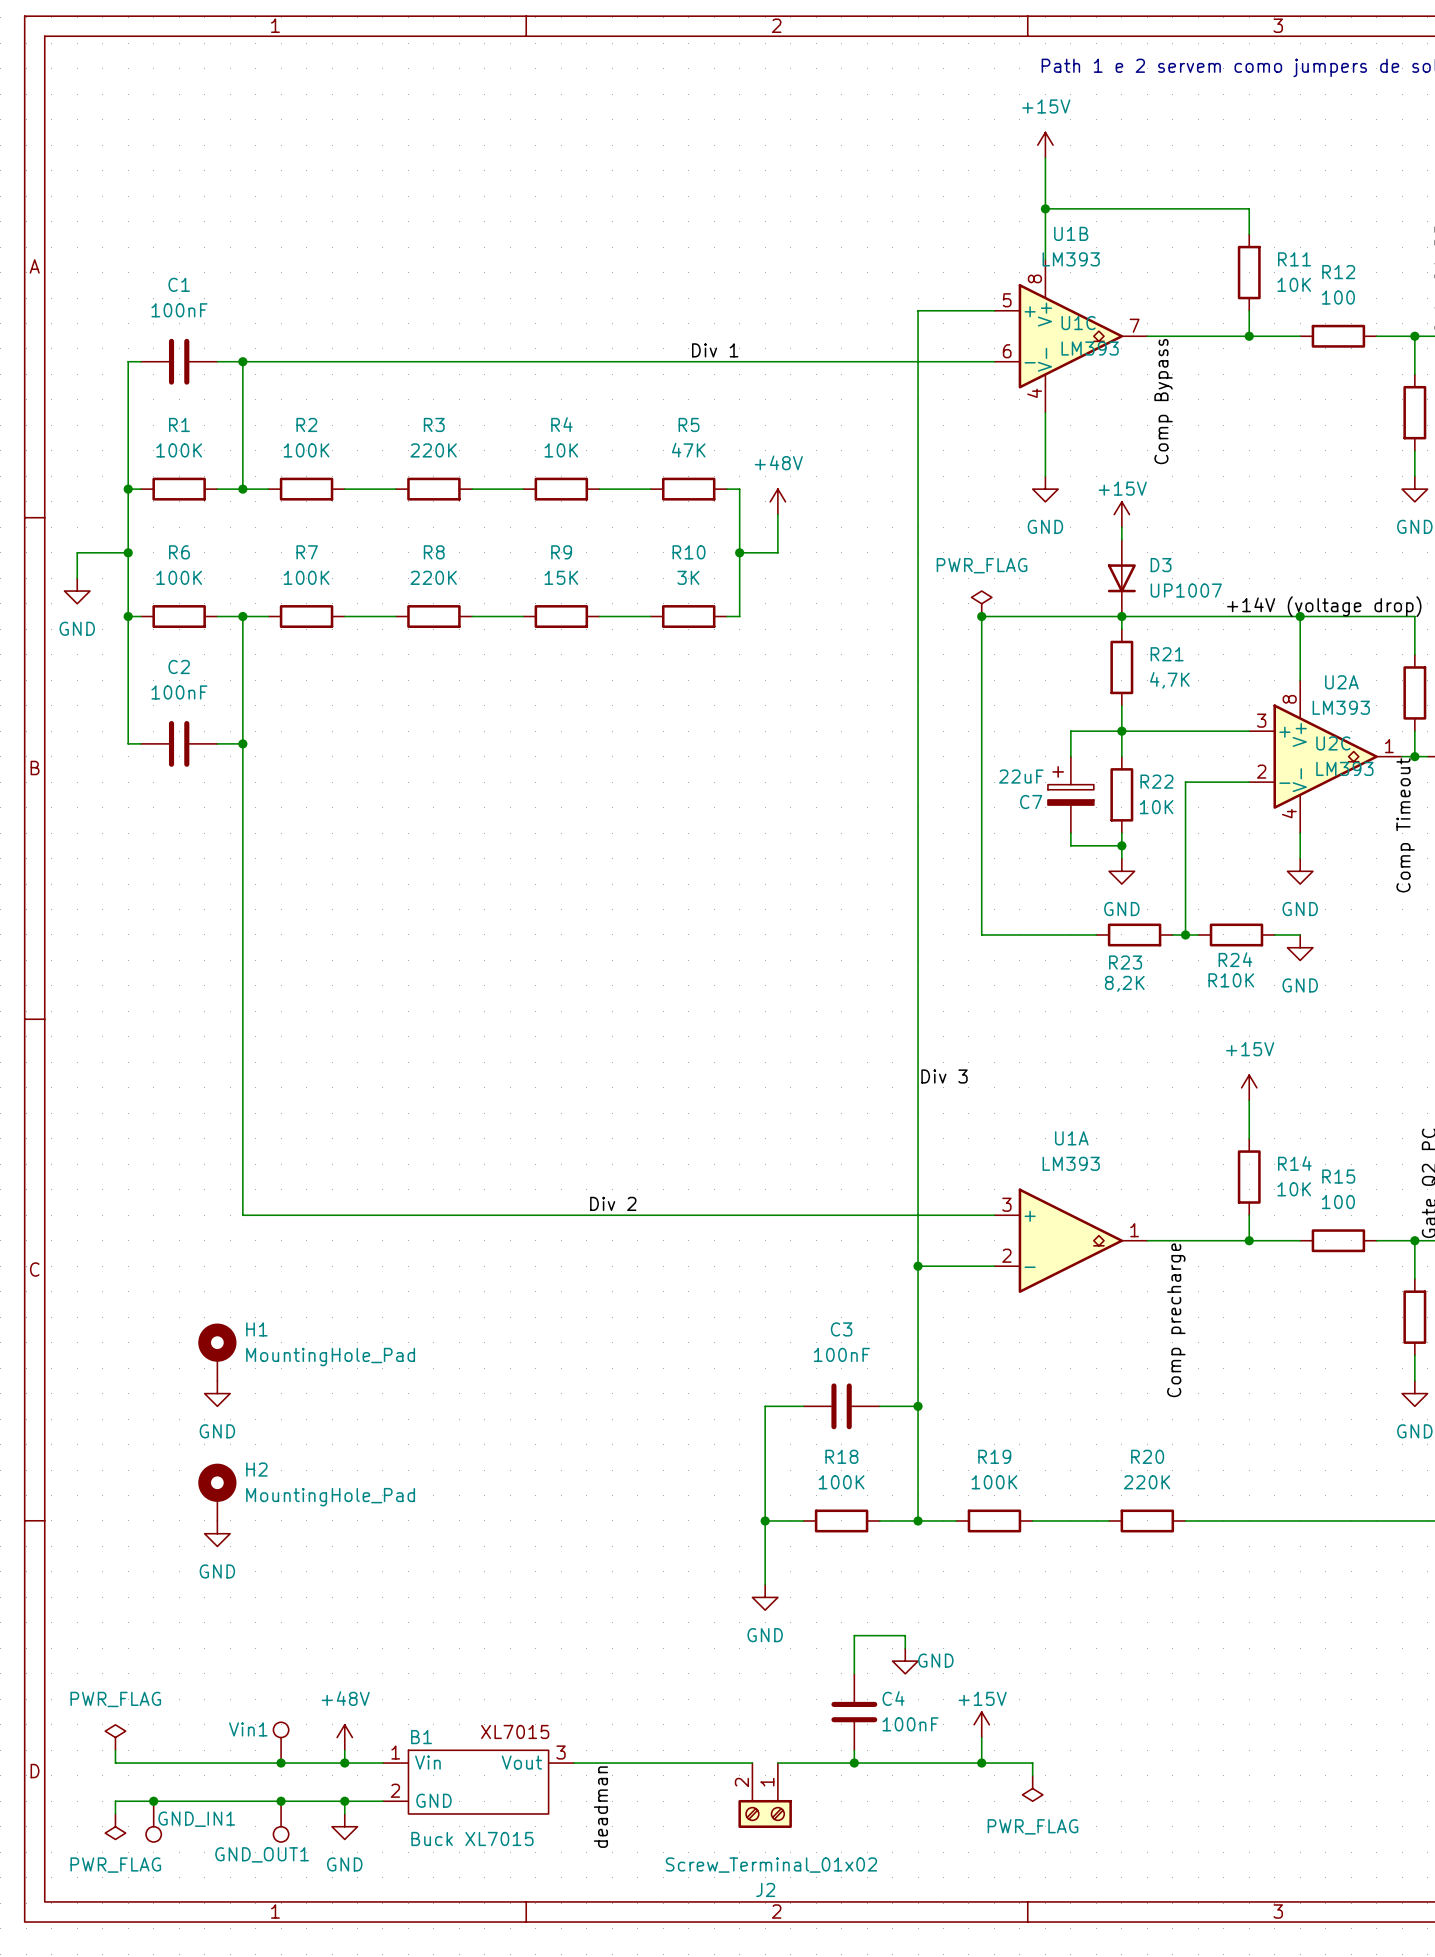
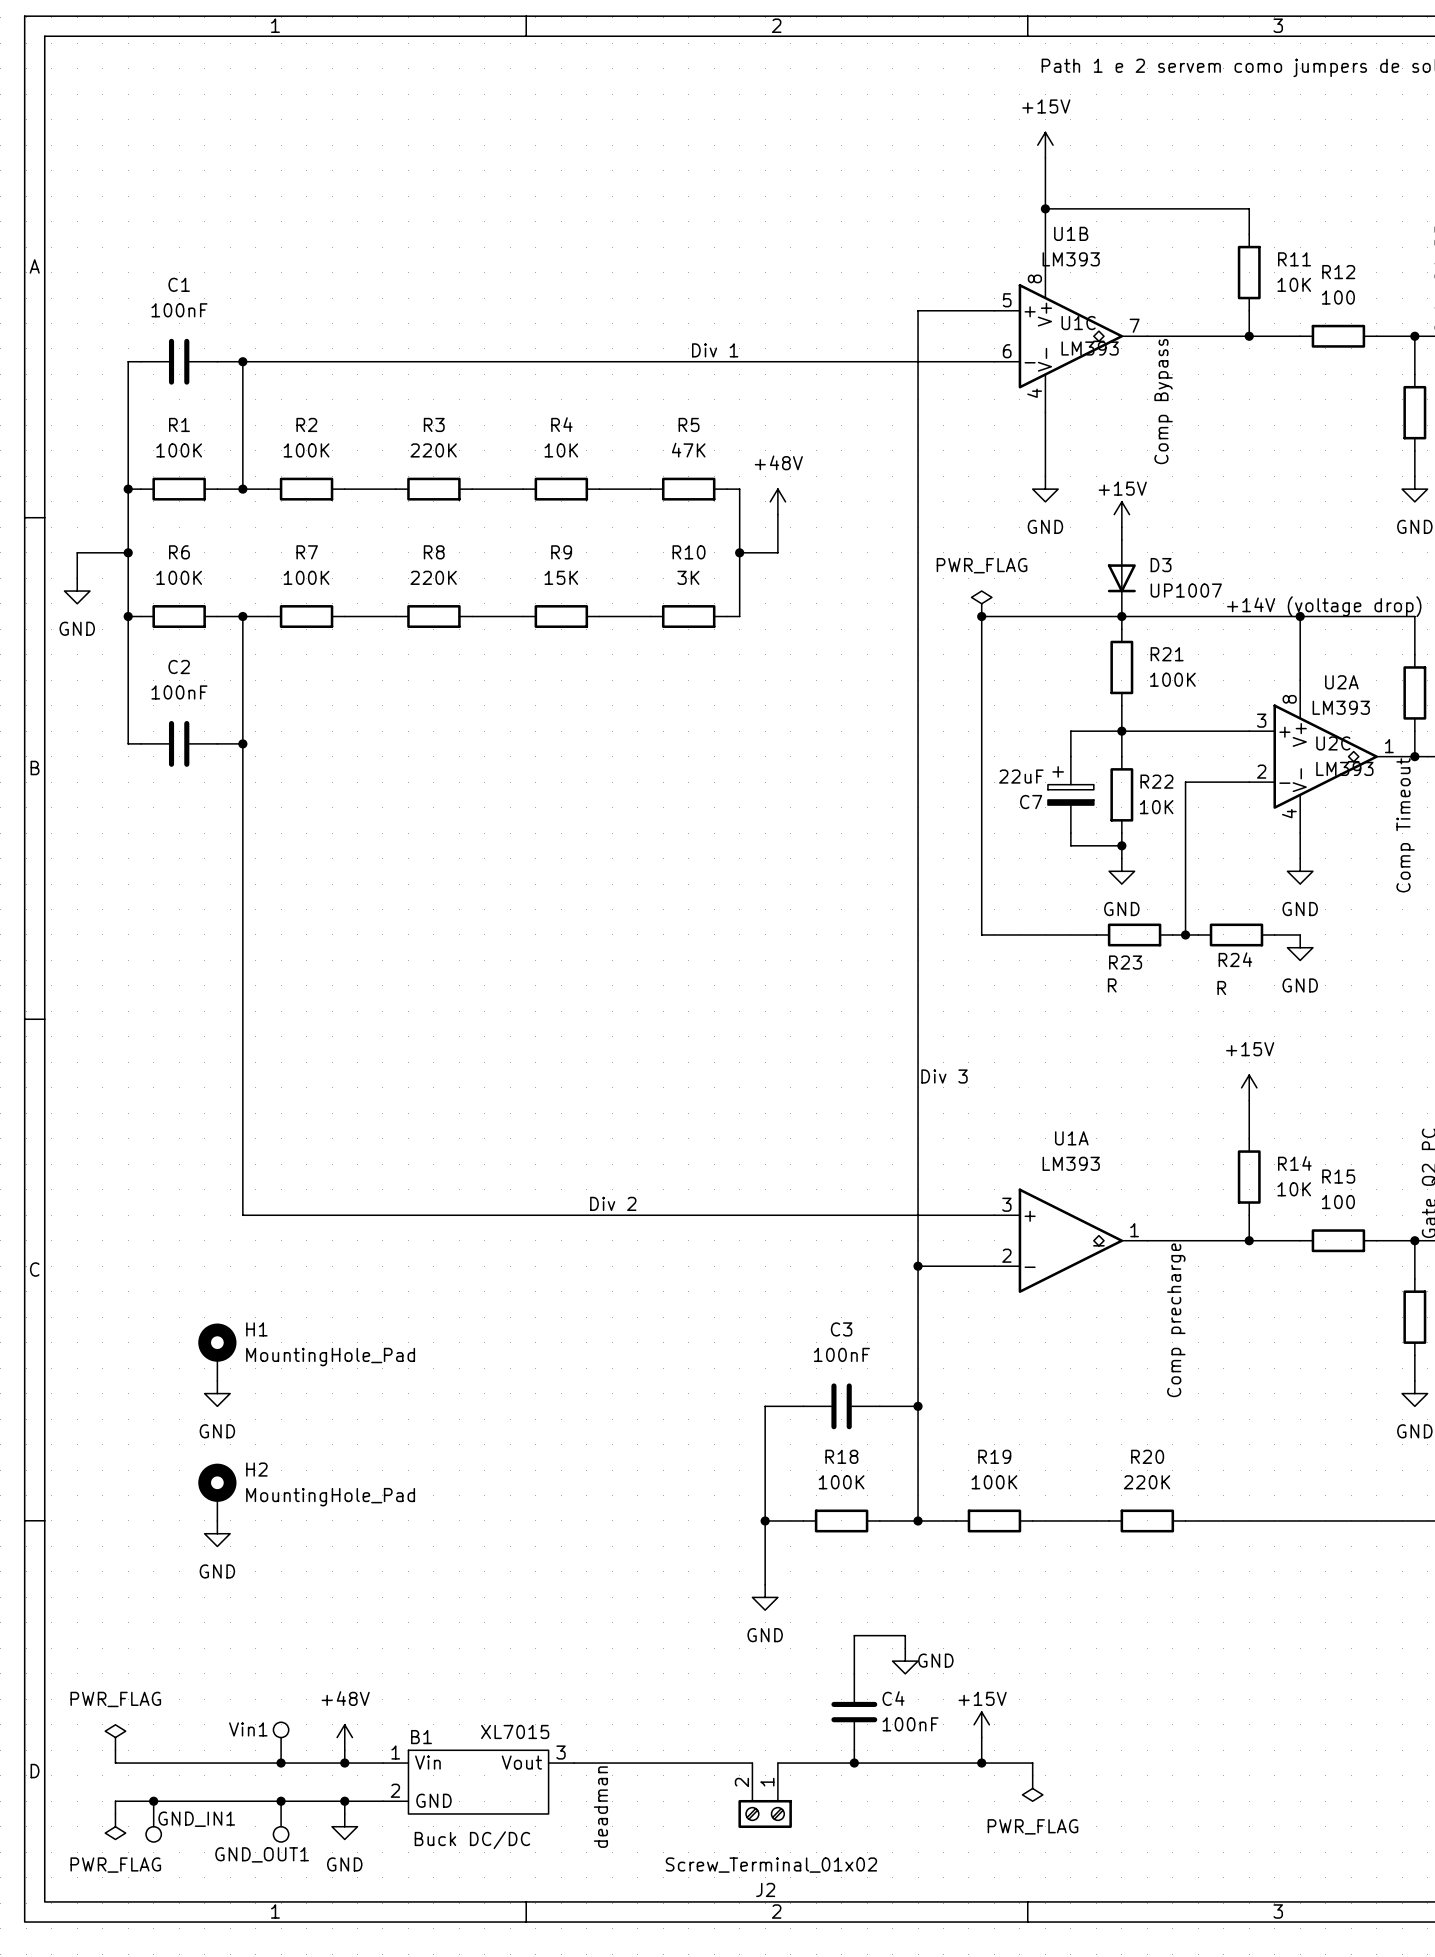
R21 value: 4,7K (1169, 680) -> 100K (1172, 679)
R24 value: R10K (1231, 980) -> R (1221, 988)
R23 value: 8,2K (1124, 983) -> R (1112, 985)
B1 value: Buck XL7015 (472, 1838) -> Buck DC/DC (472, 1840)

